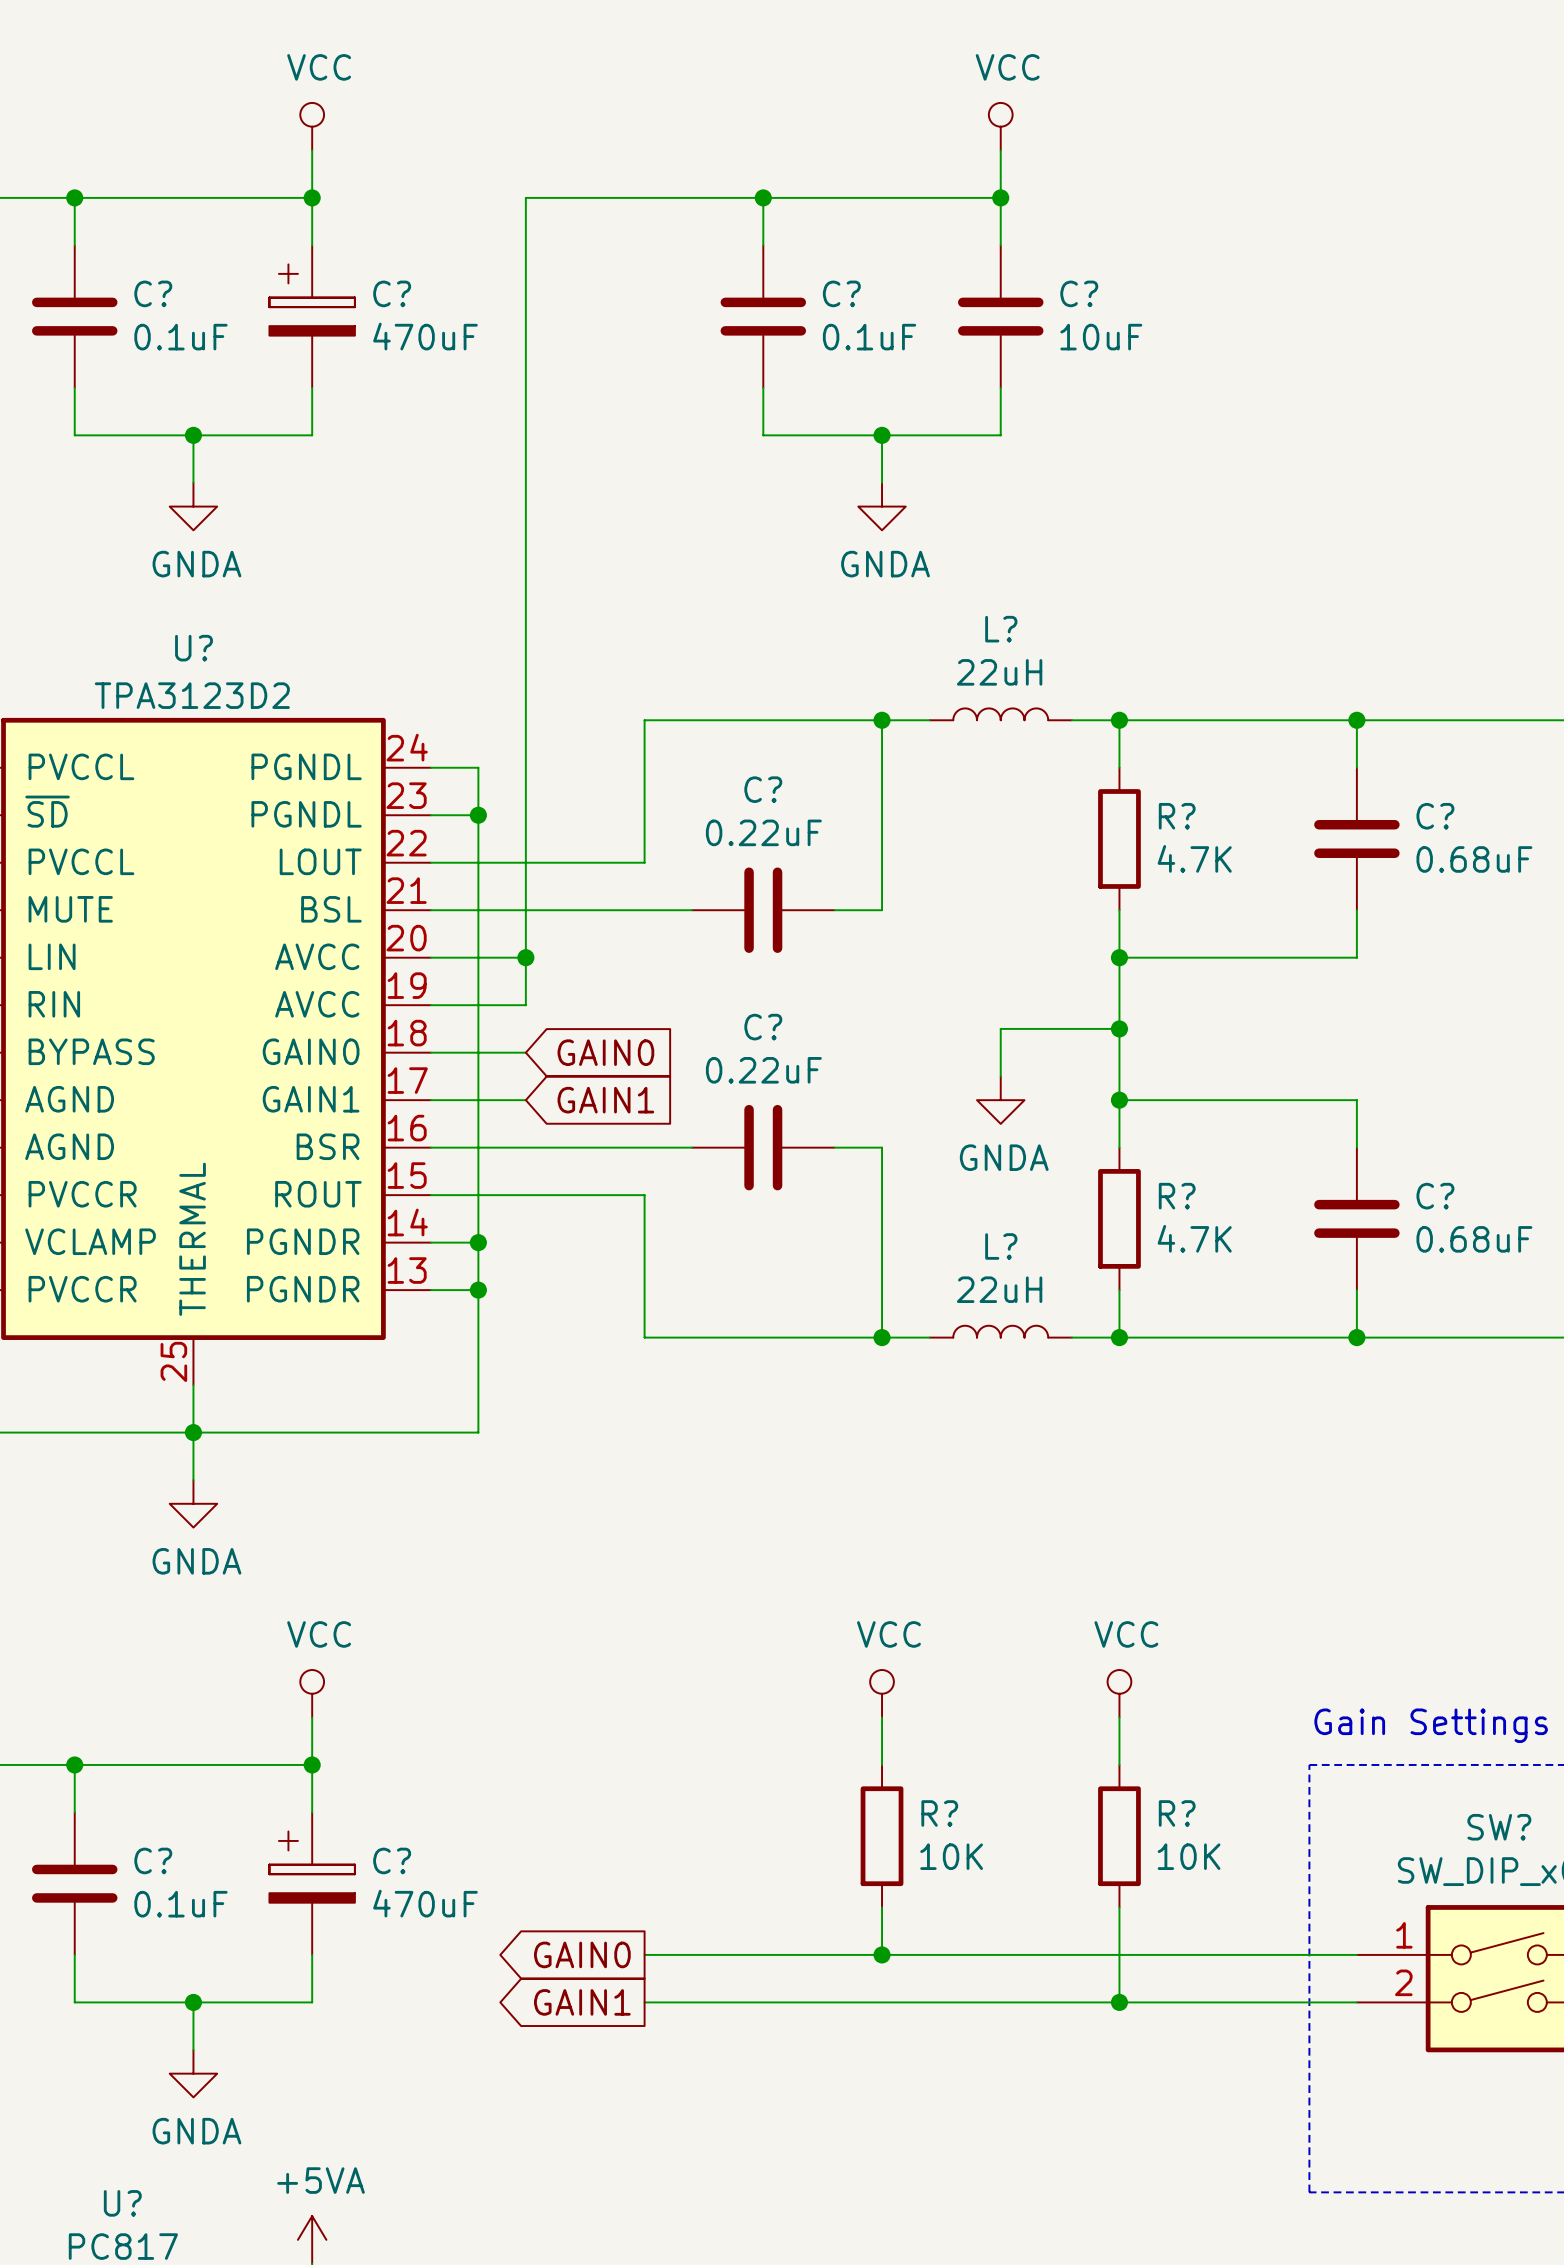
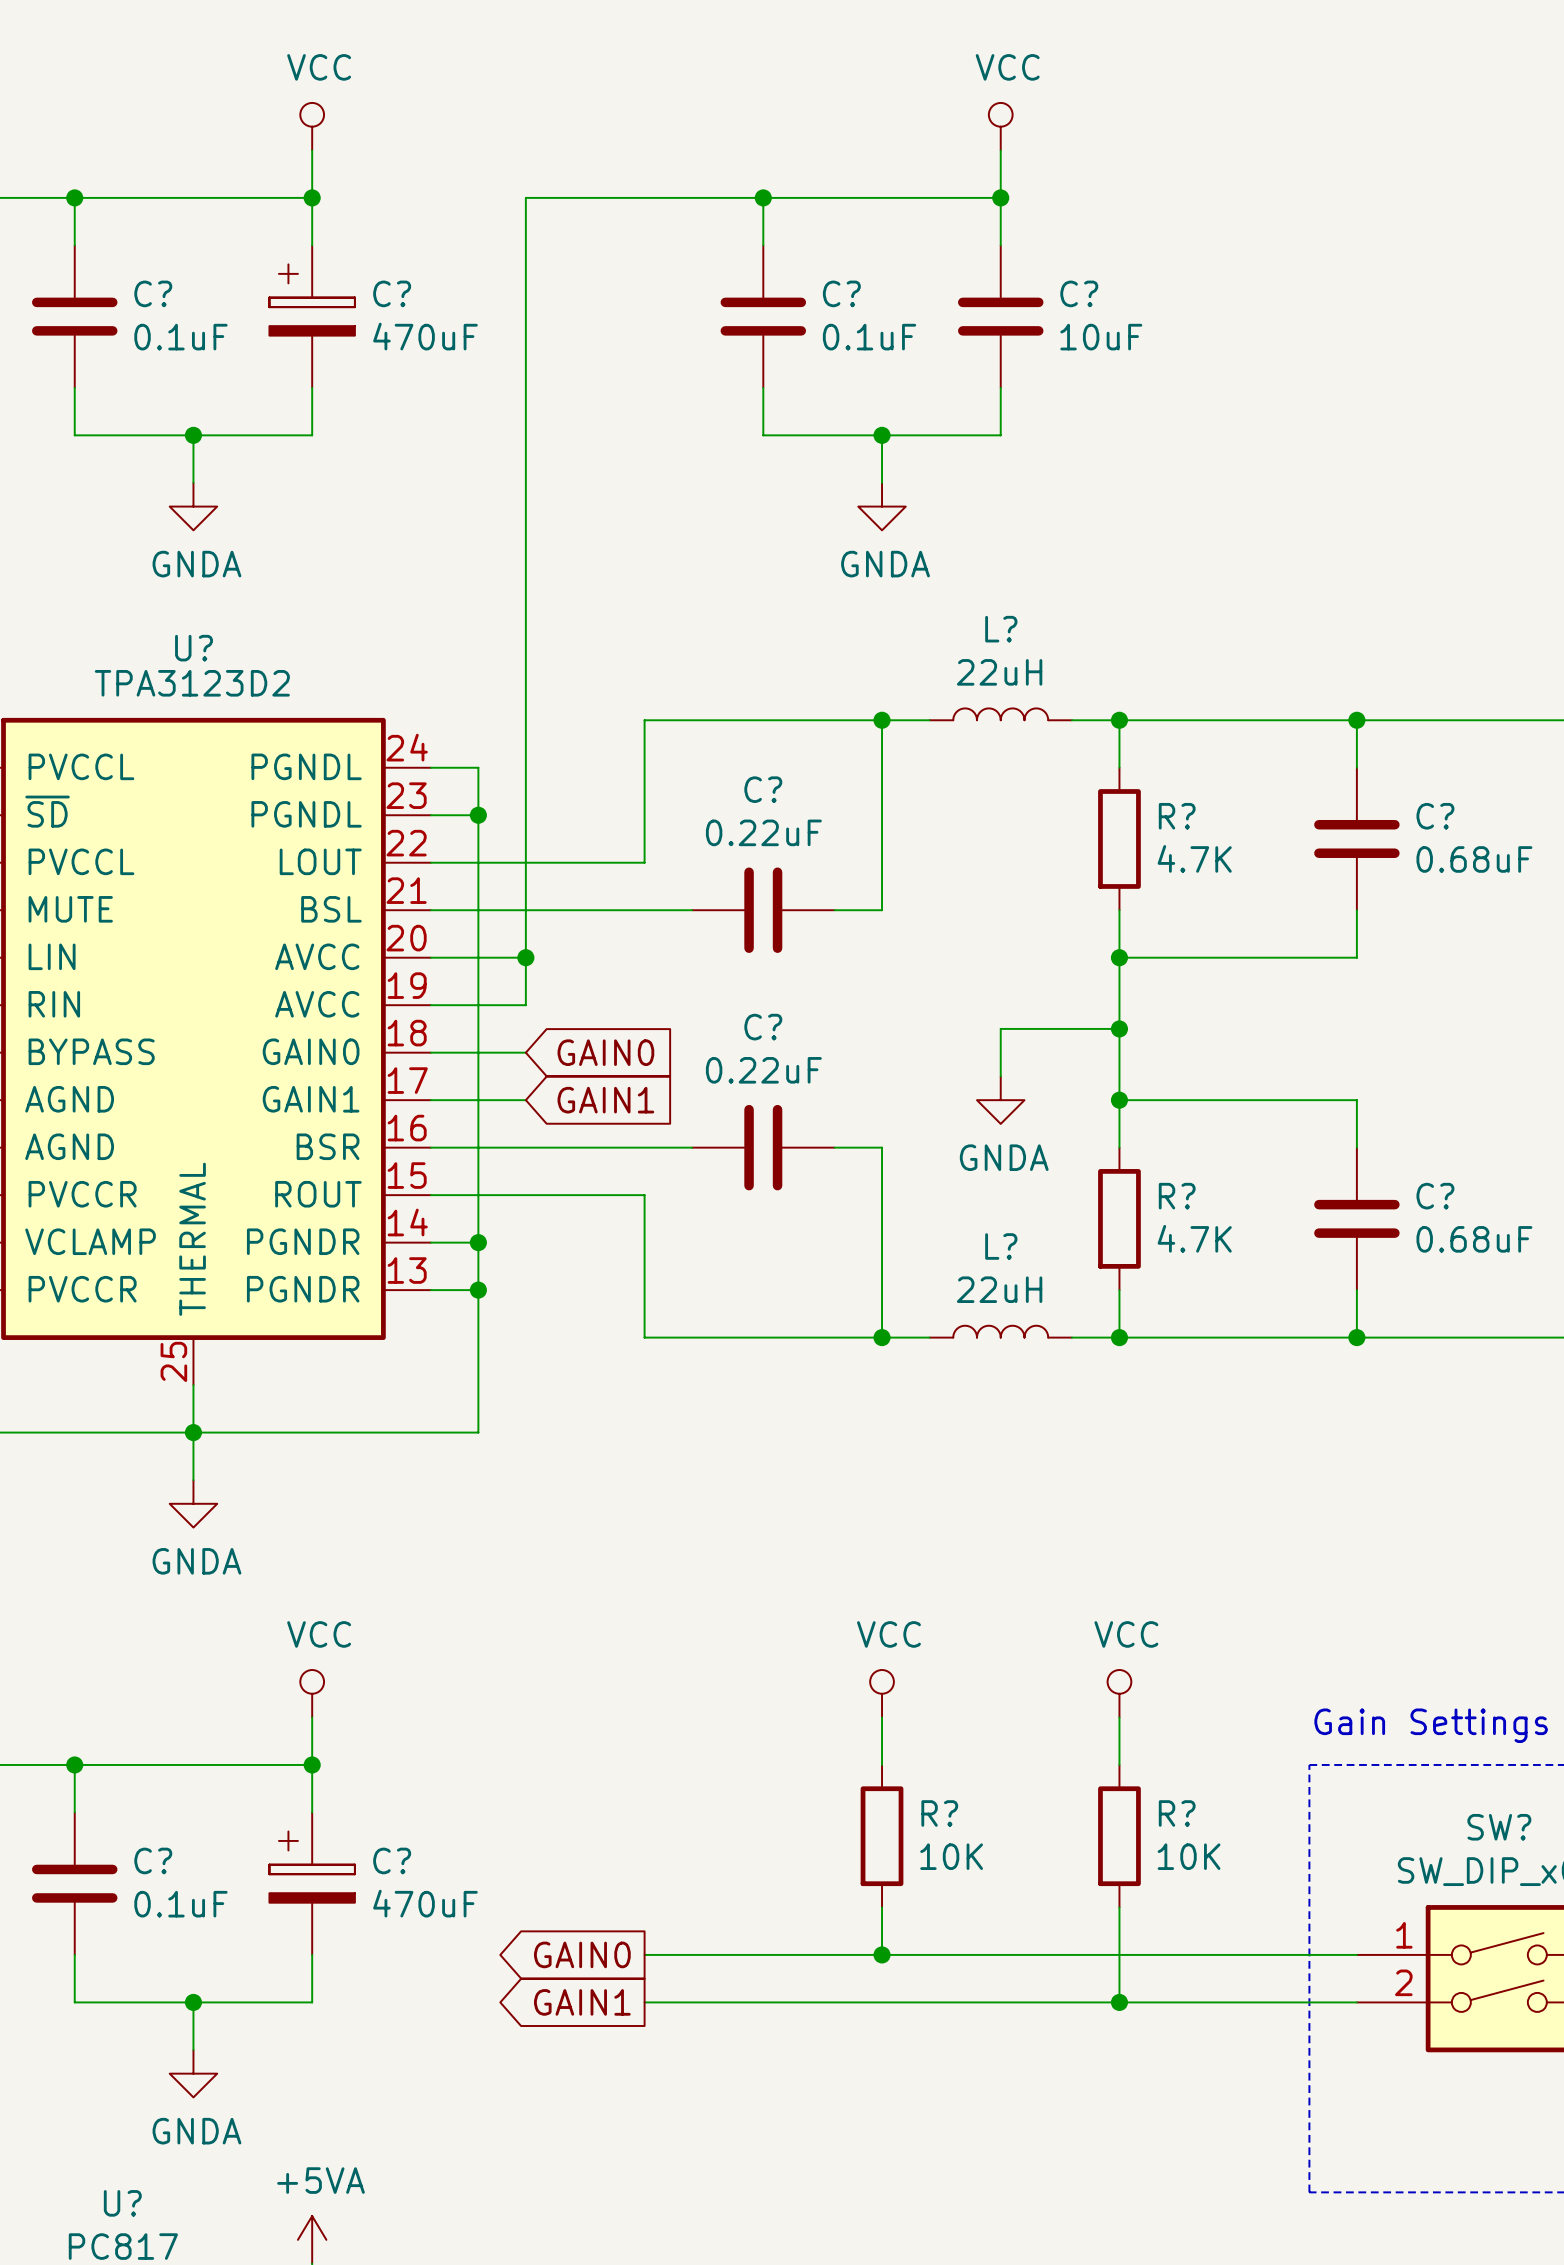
U? value position: TPA3123D2 (192, 695) -> TPA3123D2 (192, 683)

